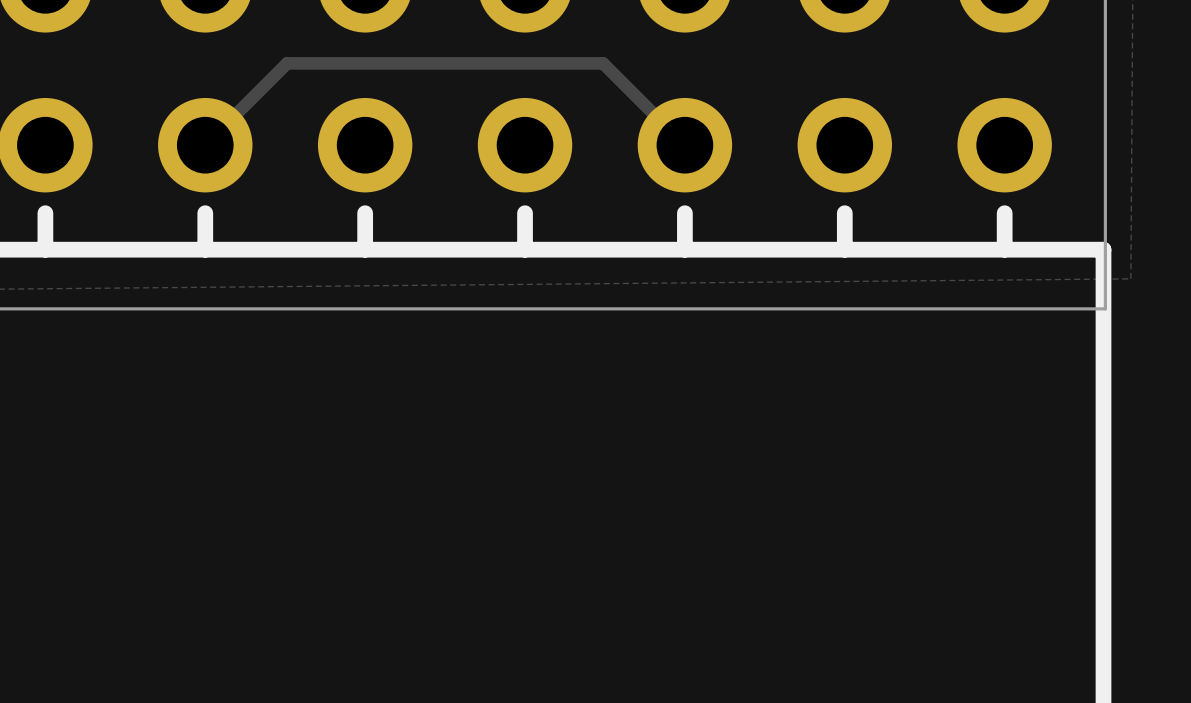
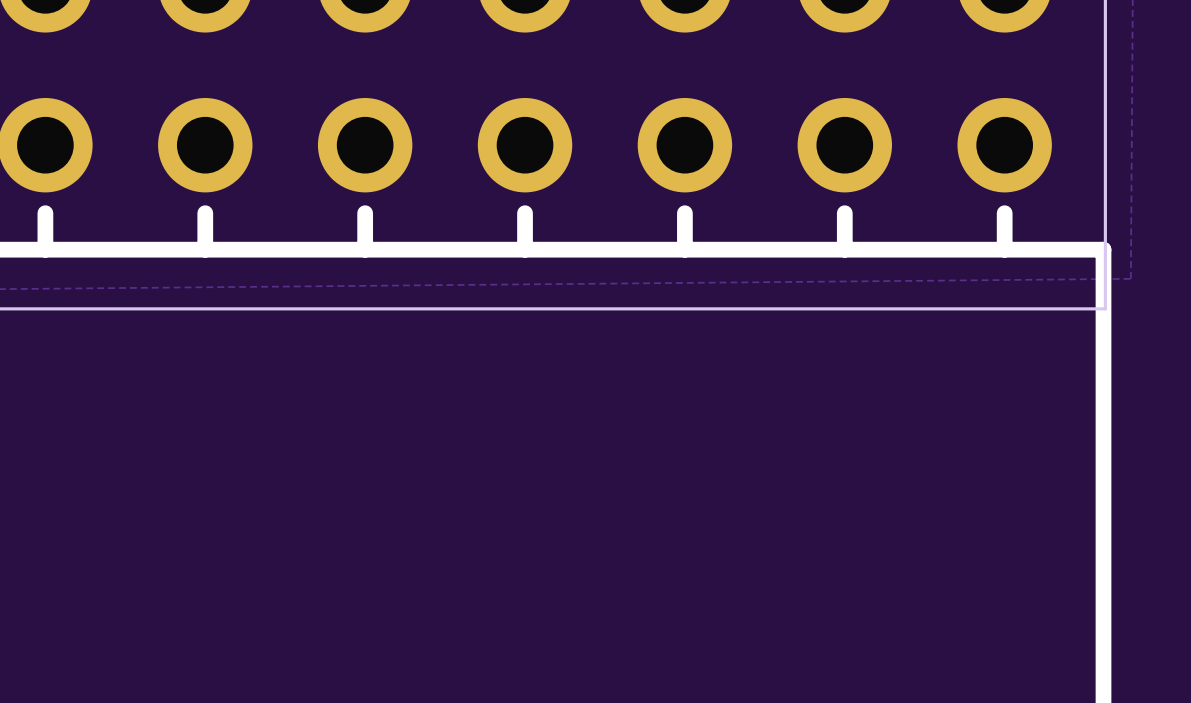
track: (205, 145) (287, 63) (603, 63) (684, 145) -> none

